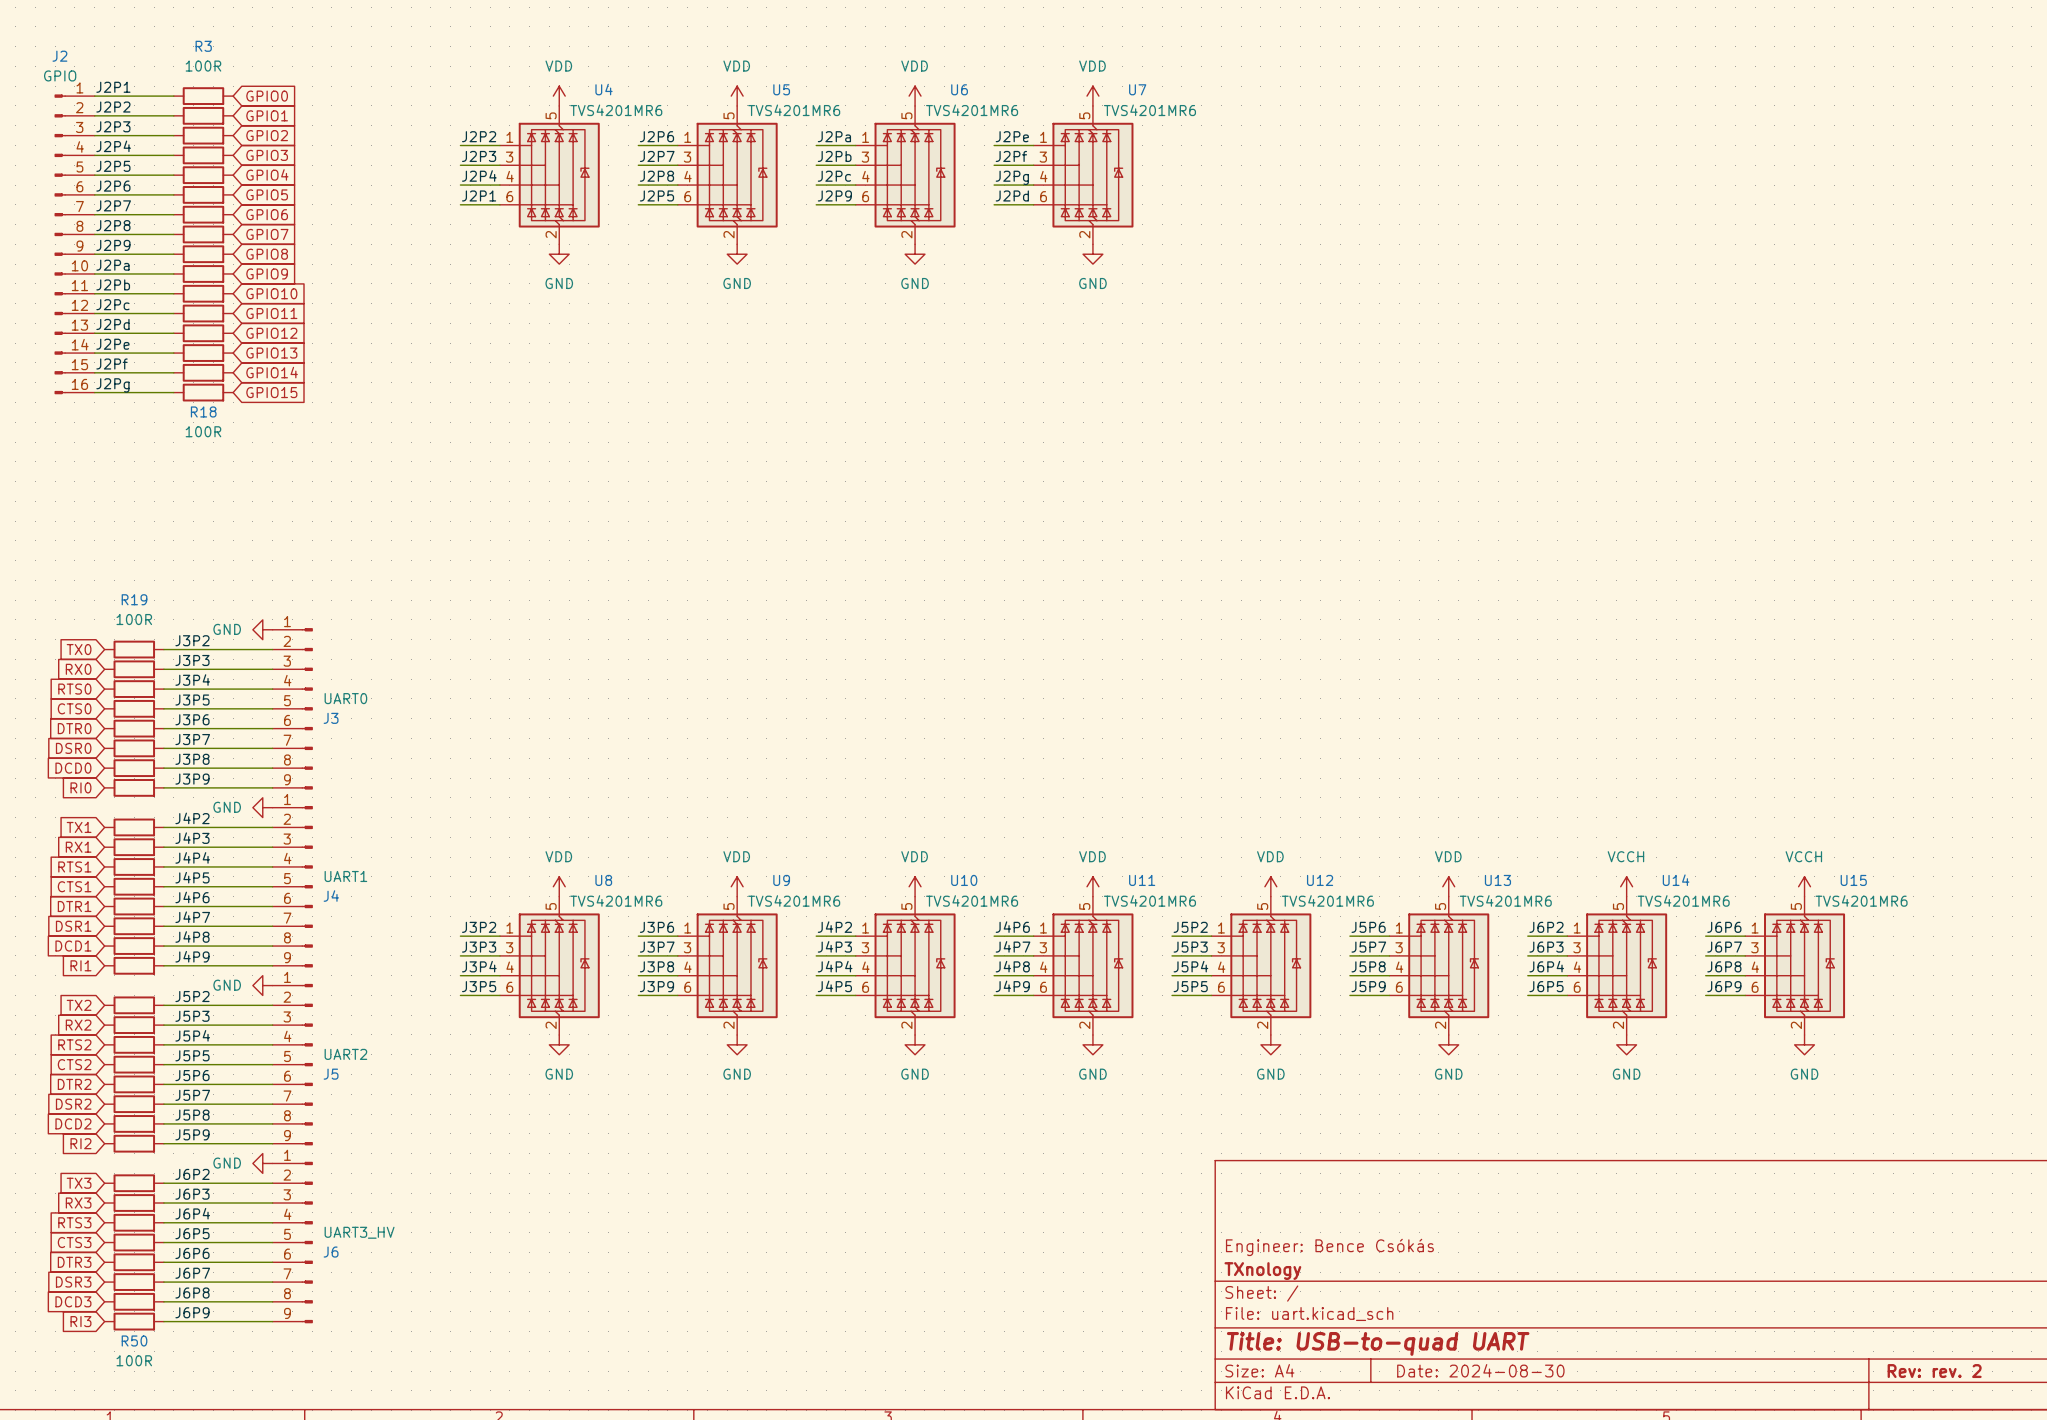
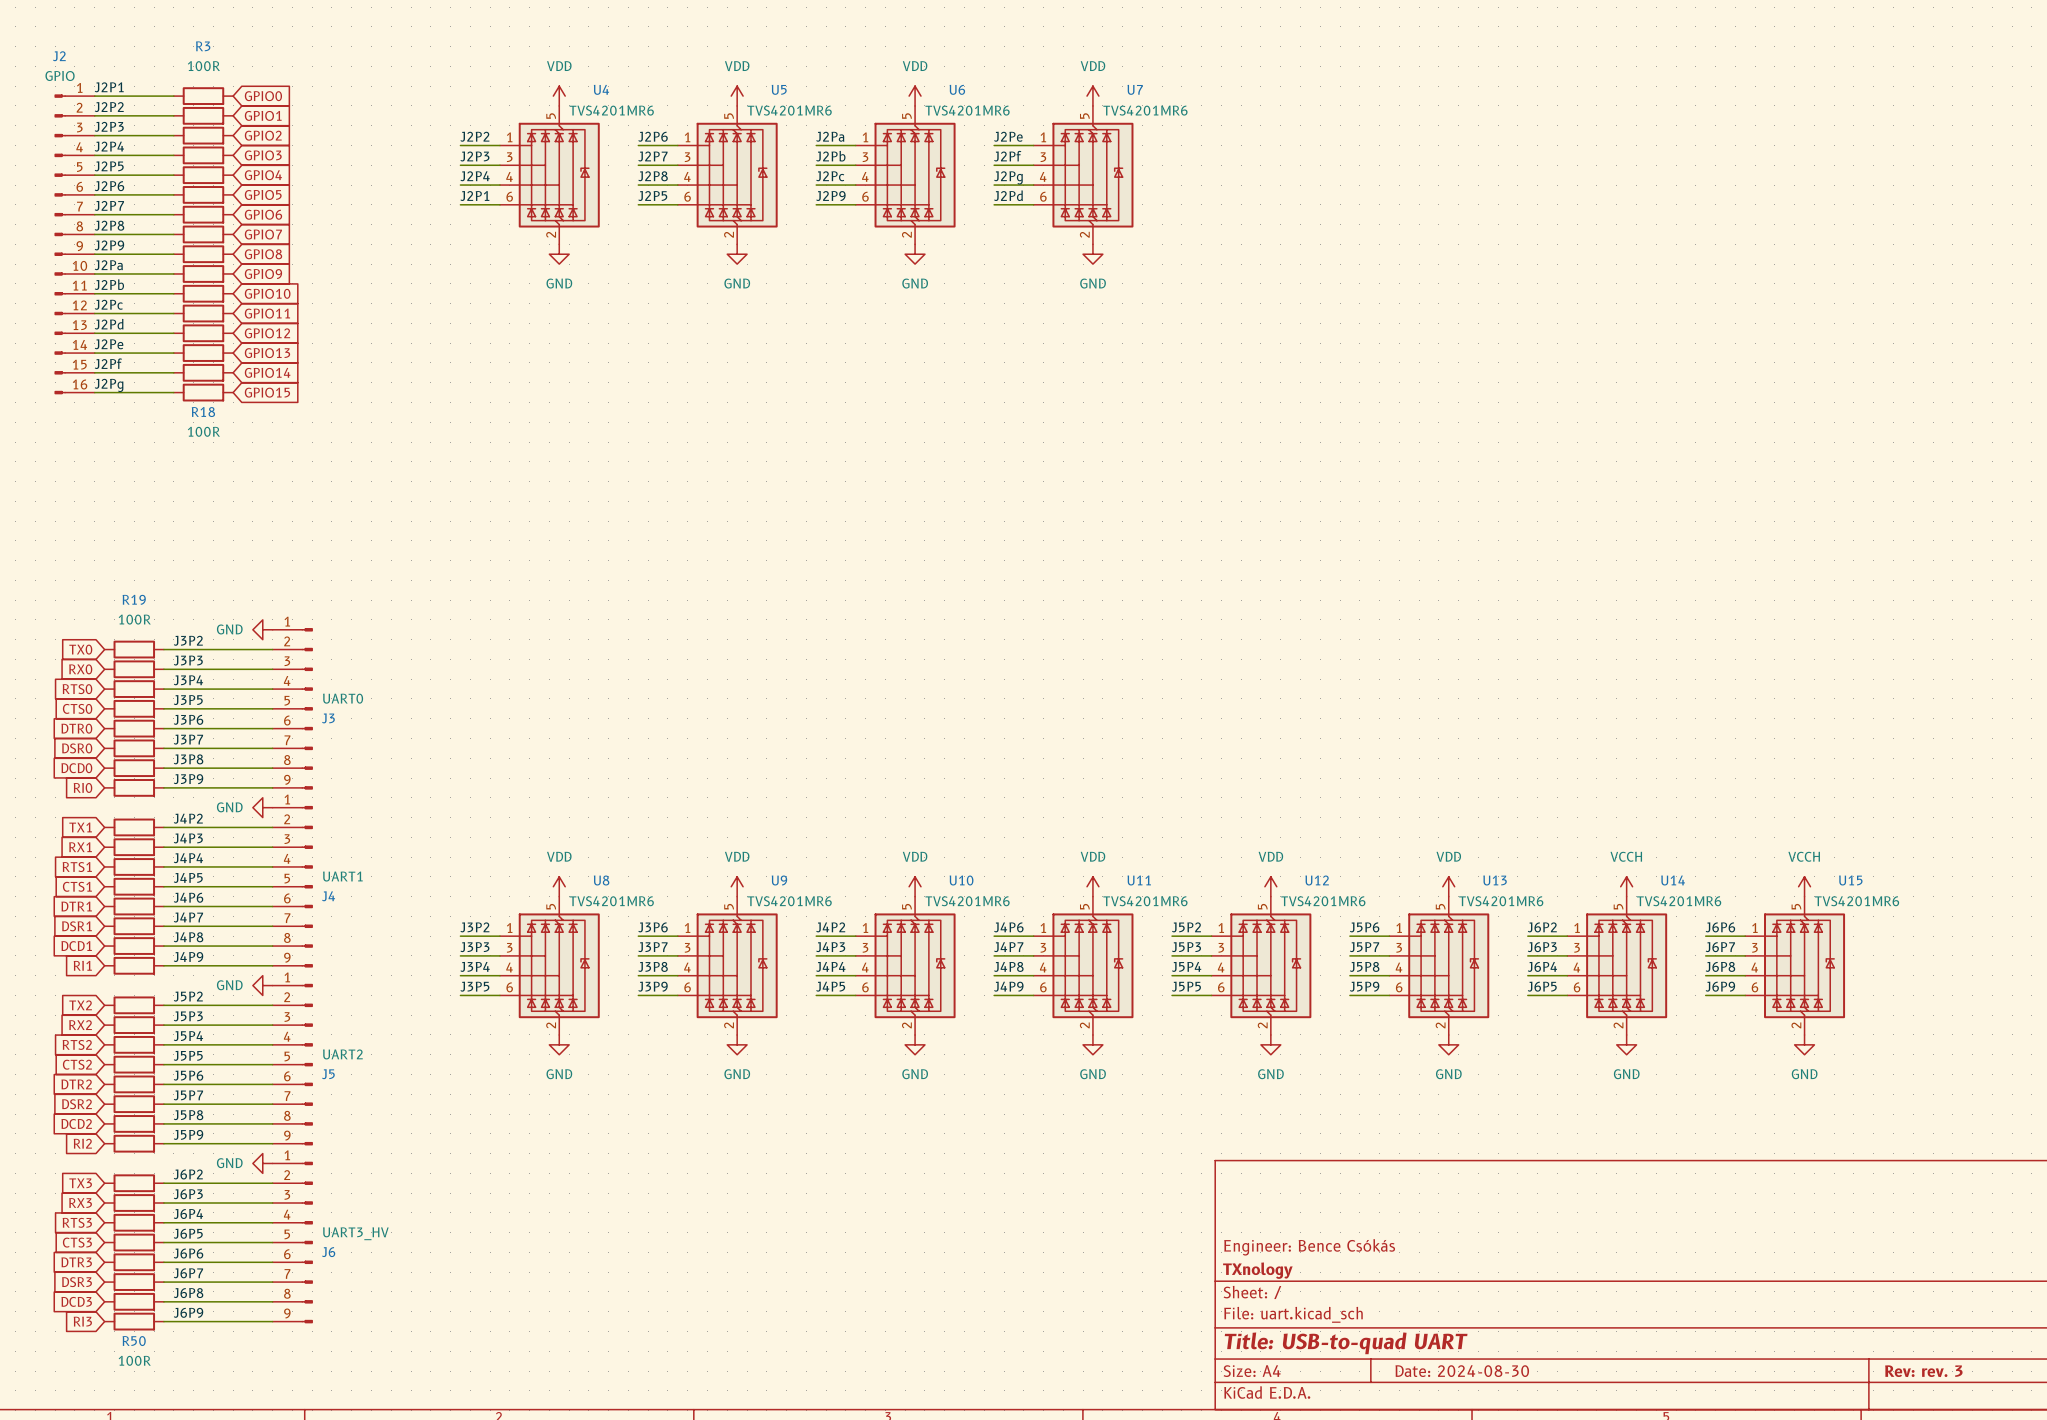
title block: Rev: rev. 2 (1934, 1371) -> Rev: rev. 3 (1923, 1371)

